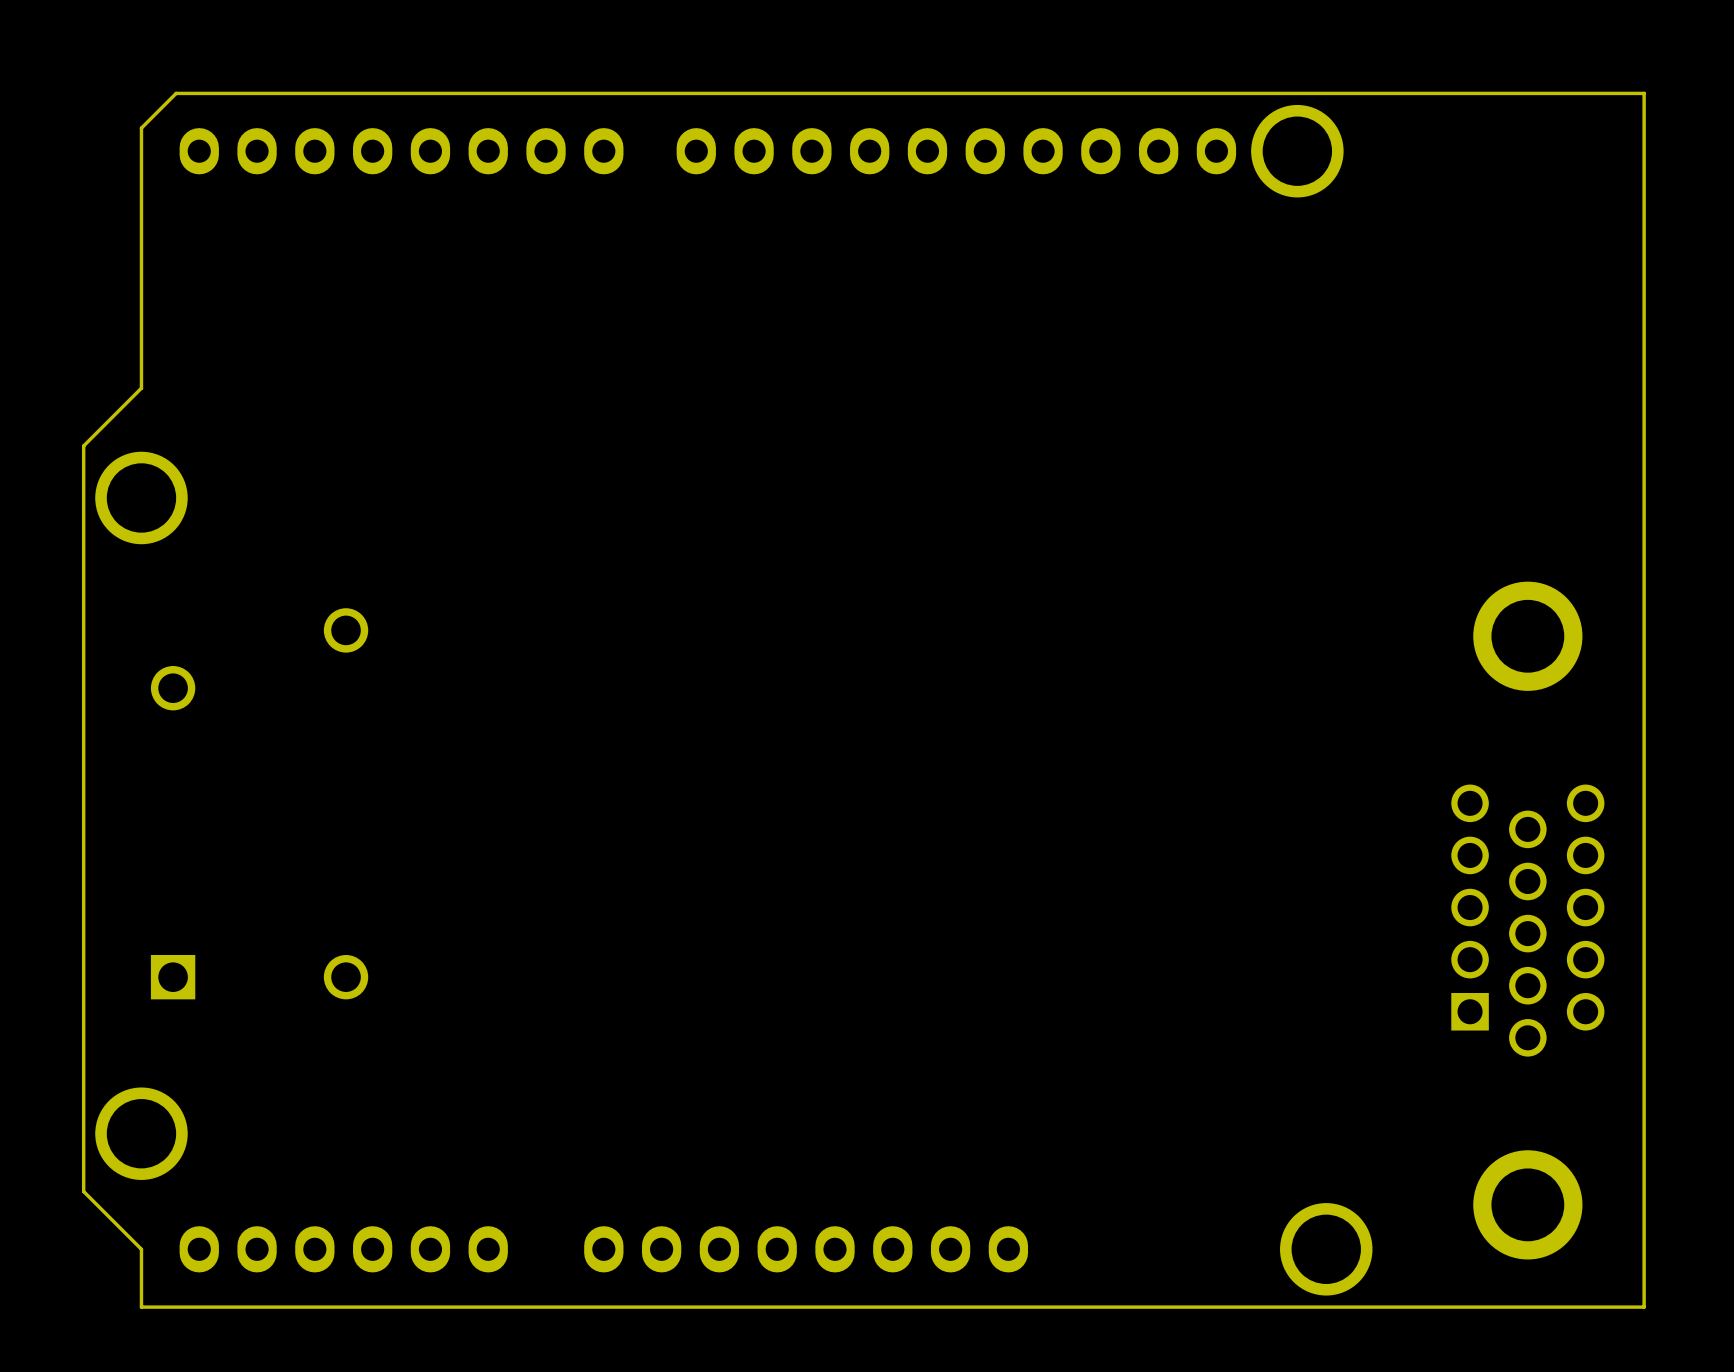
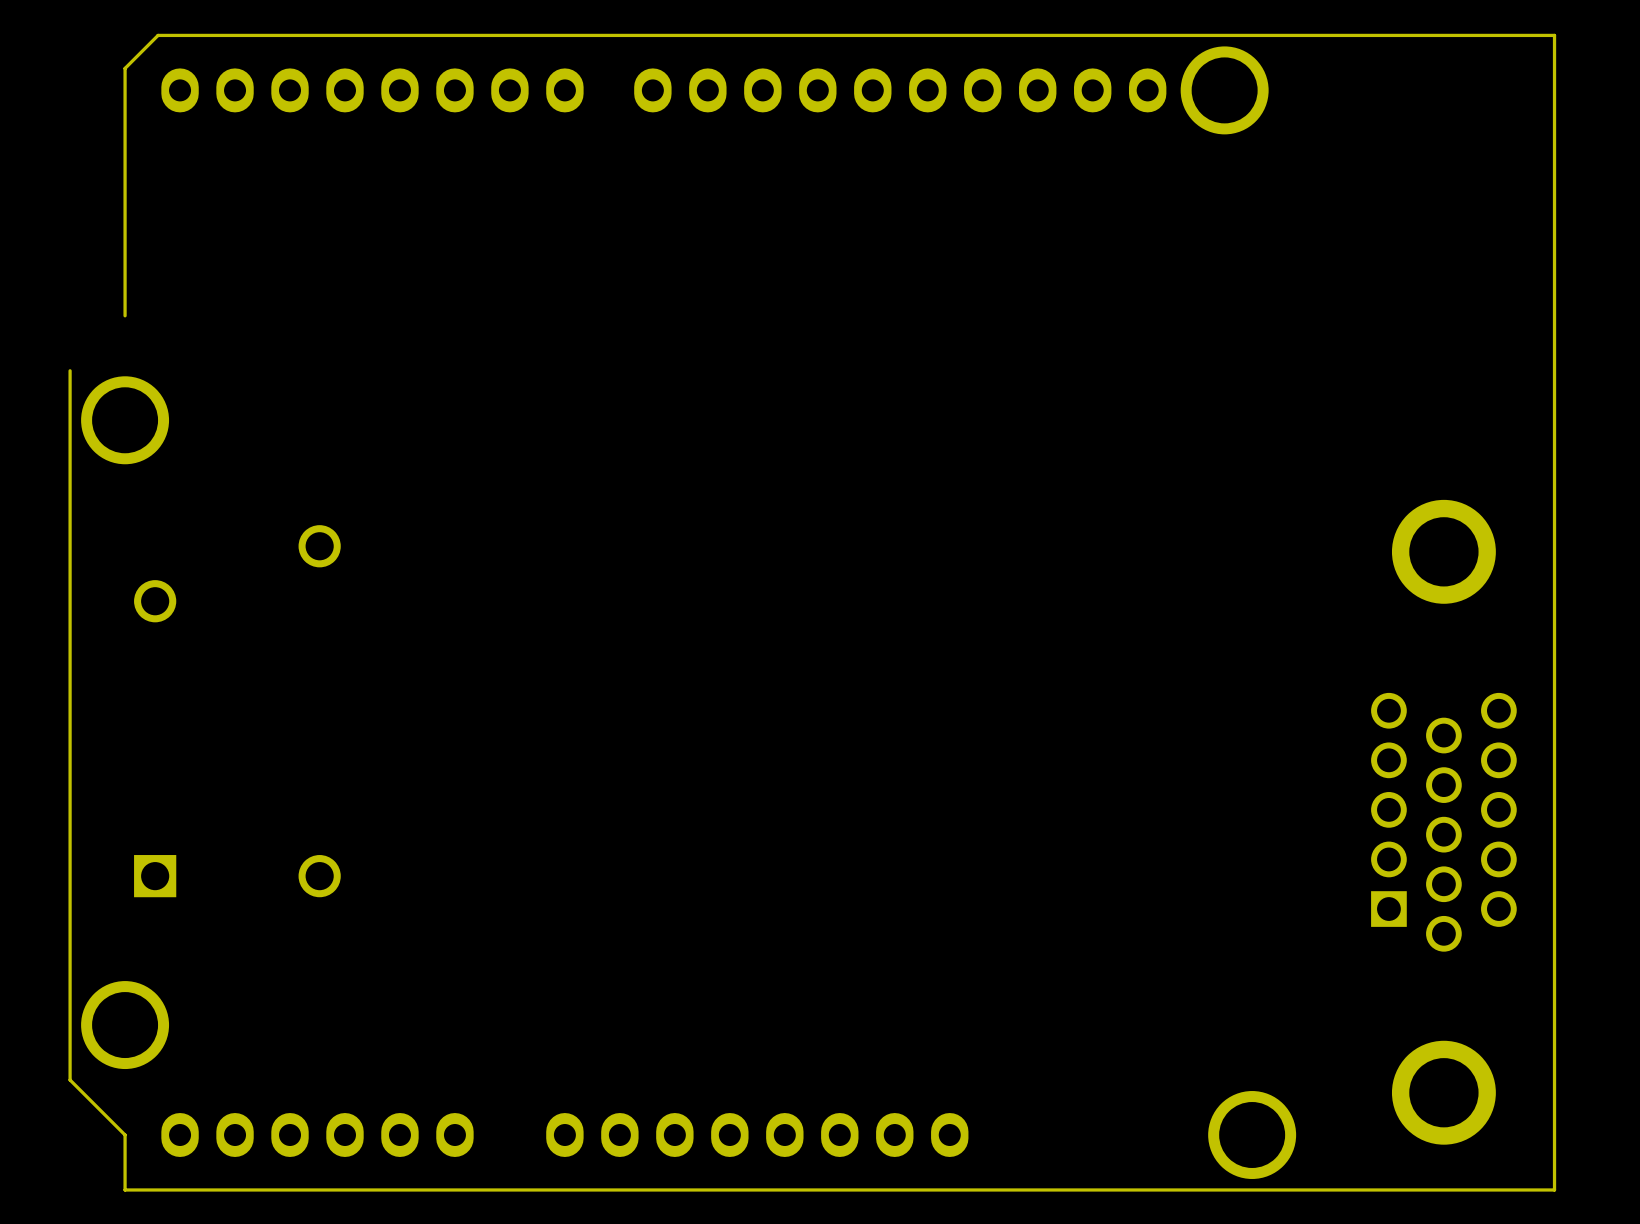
board edge: (141, 388) (83, 445) -> none

